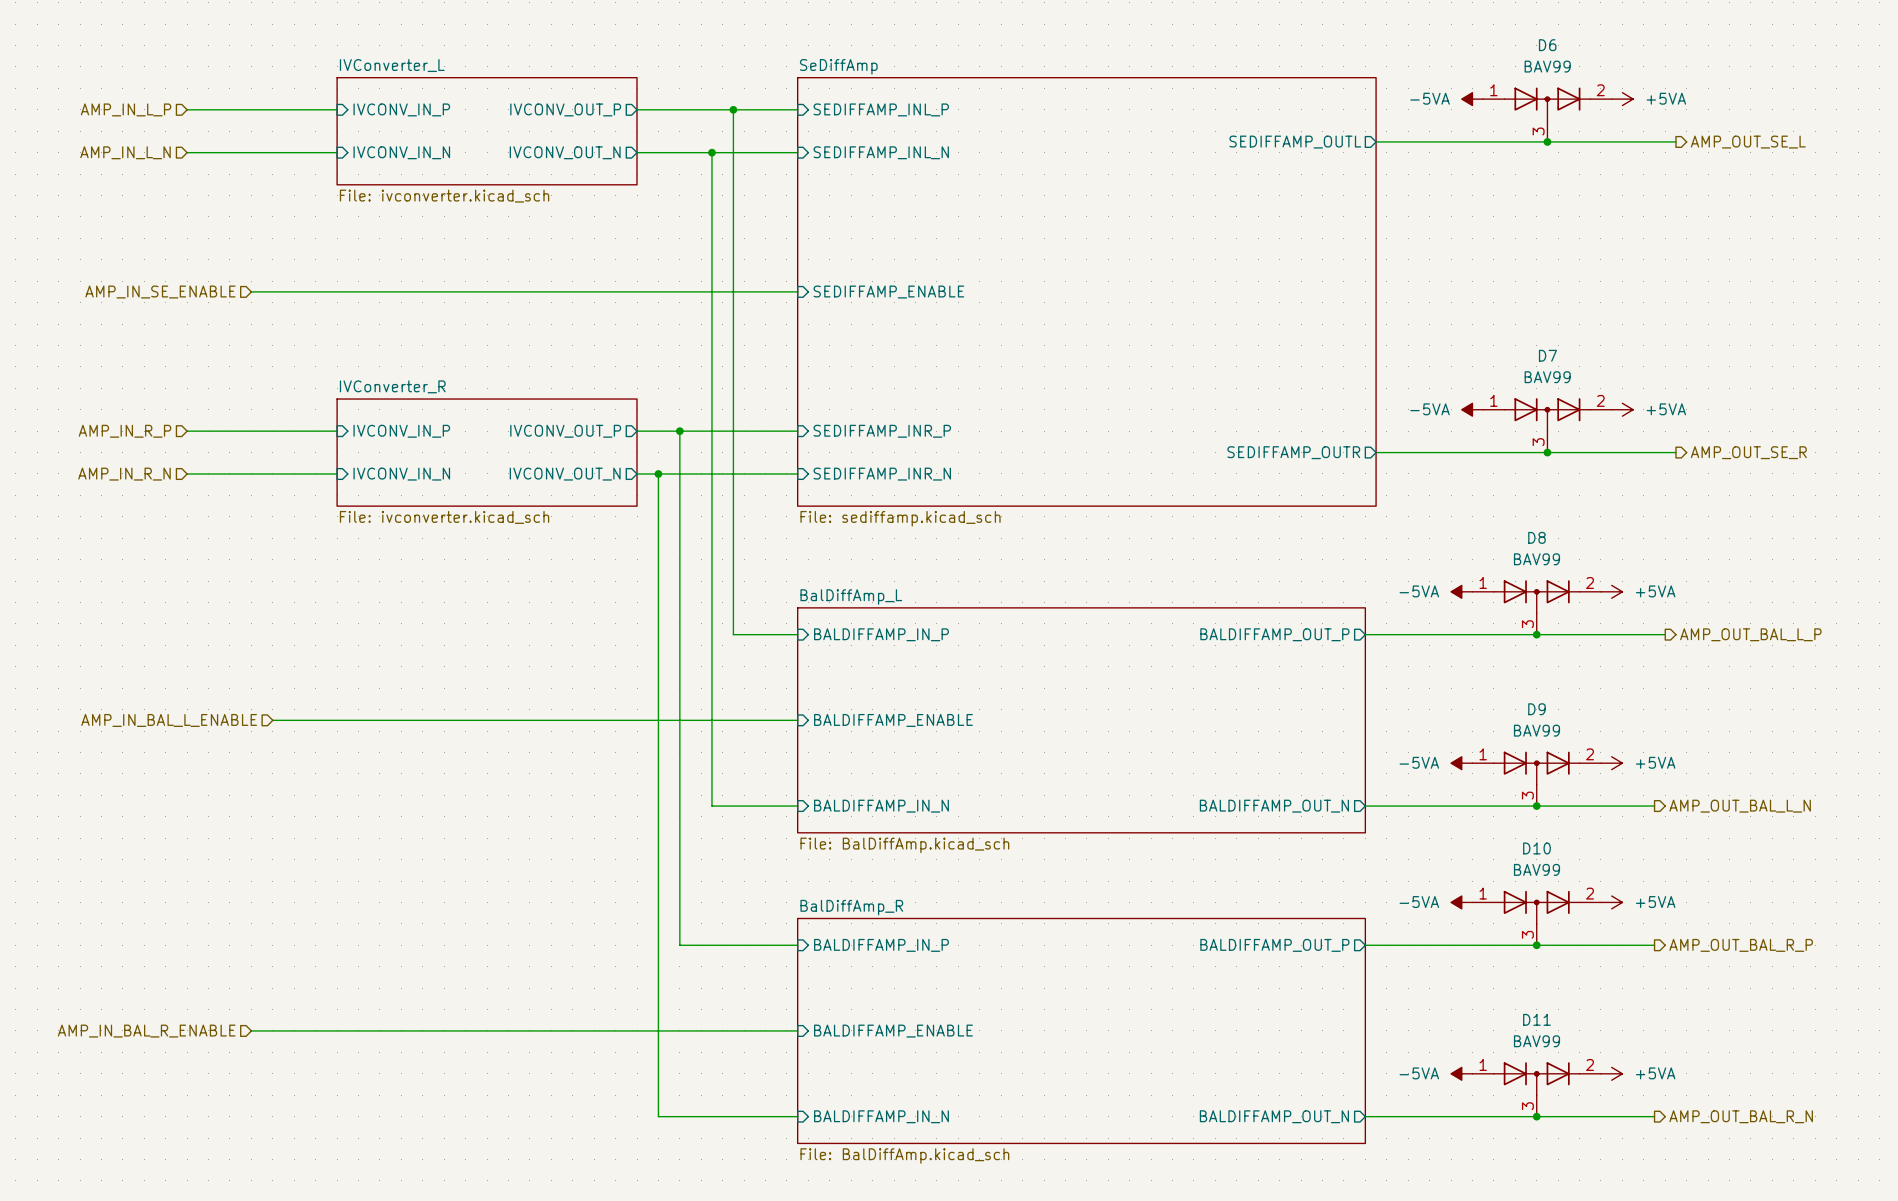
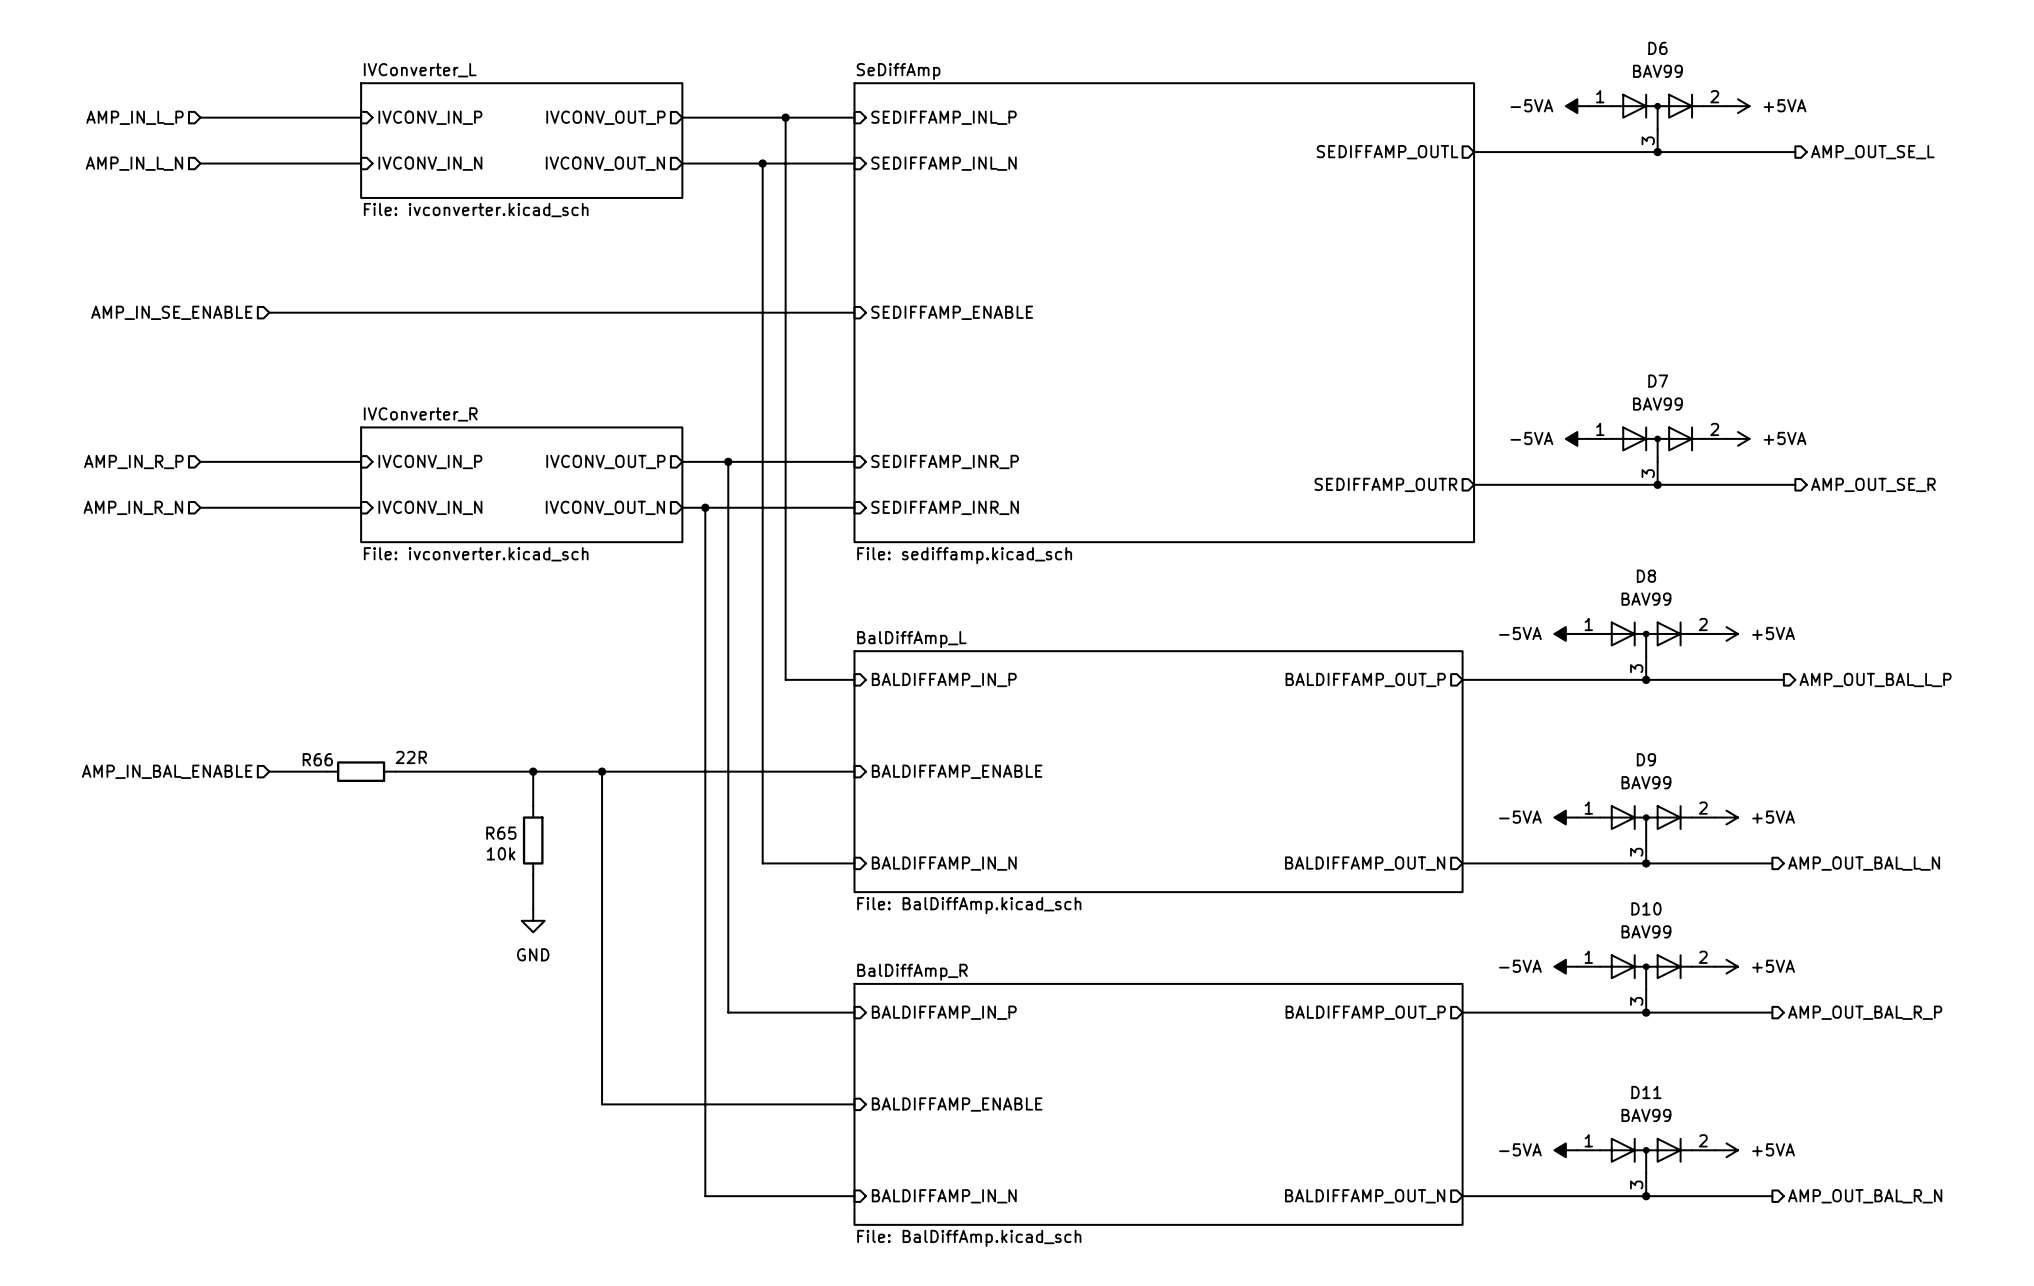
hierarchical label: AMP_IN_BAL_L_ENABLE (169, 720) -> AMP_IN_BAL_ENABLE (167, 771)
wire: none -> (269, 771) (292, 771)
wire: (304, 720) (369, 720) -> none
R66: none -> 22R (361, 771)
wire: none -> (533, 771) (533, 806)
junction: none -> (533, 771)
junction: none -> (602, 771)
R65: none -> 10k (533, 840)
wire: none -> (533, 874) (533, 909)
power symbol: none -> GND (533, 920)
wire: (251, 1030) (562, 1030) -> (602, 771) (602, 1104)
hierarchical label: AMP_IN_BAL_R_ENABLE (146, 1031) -> none

